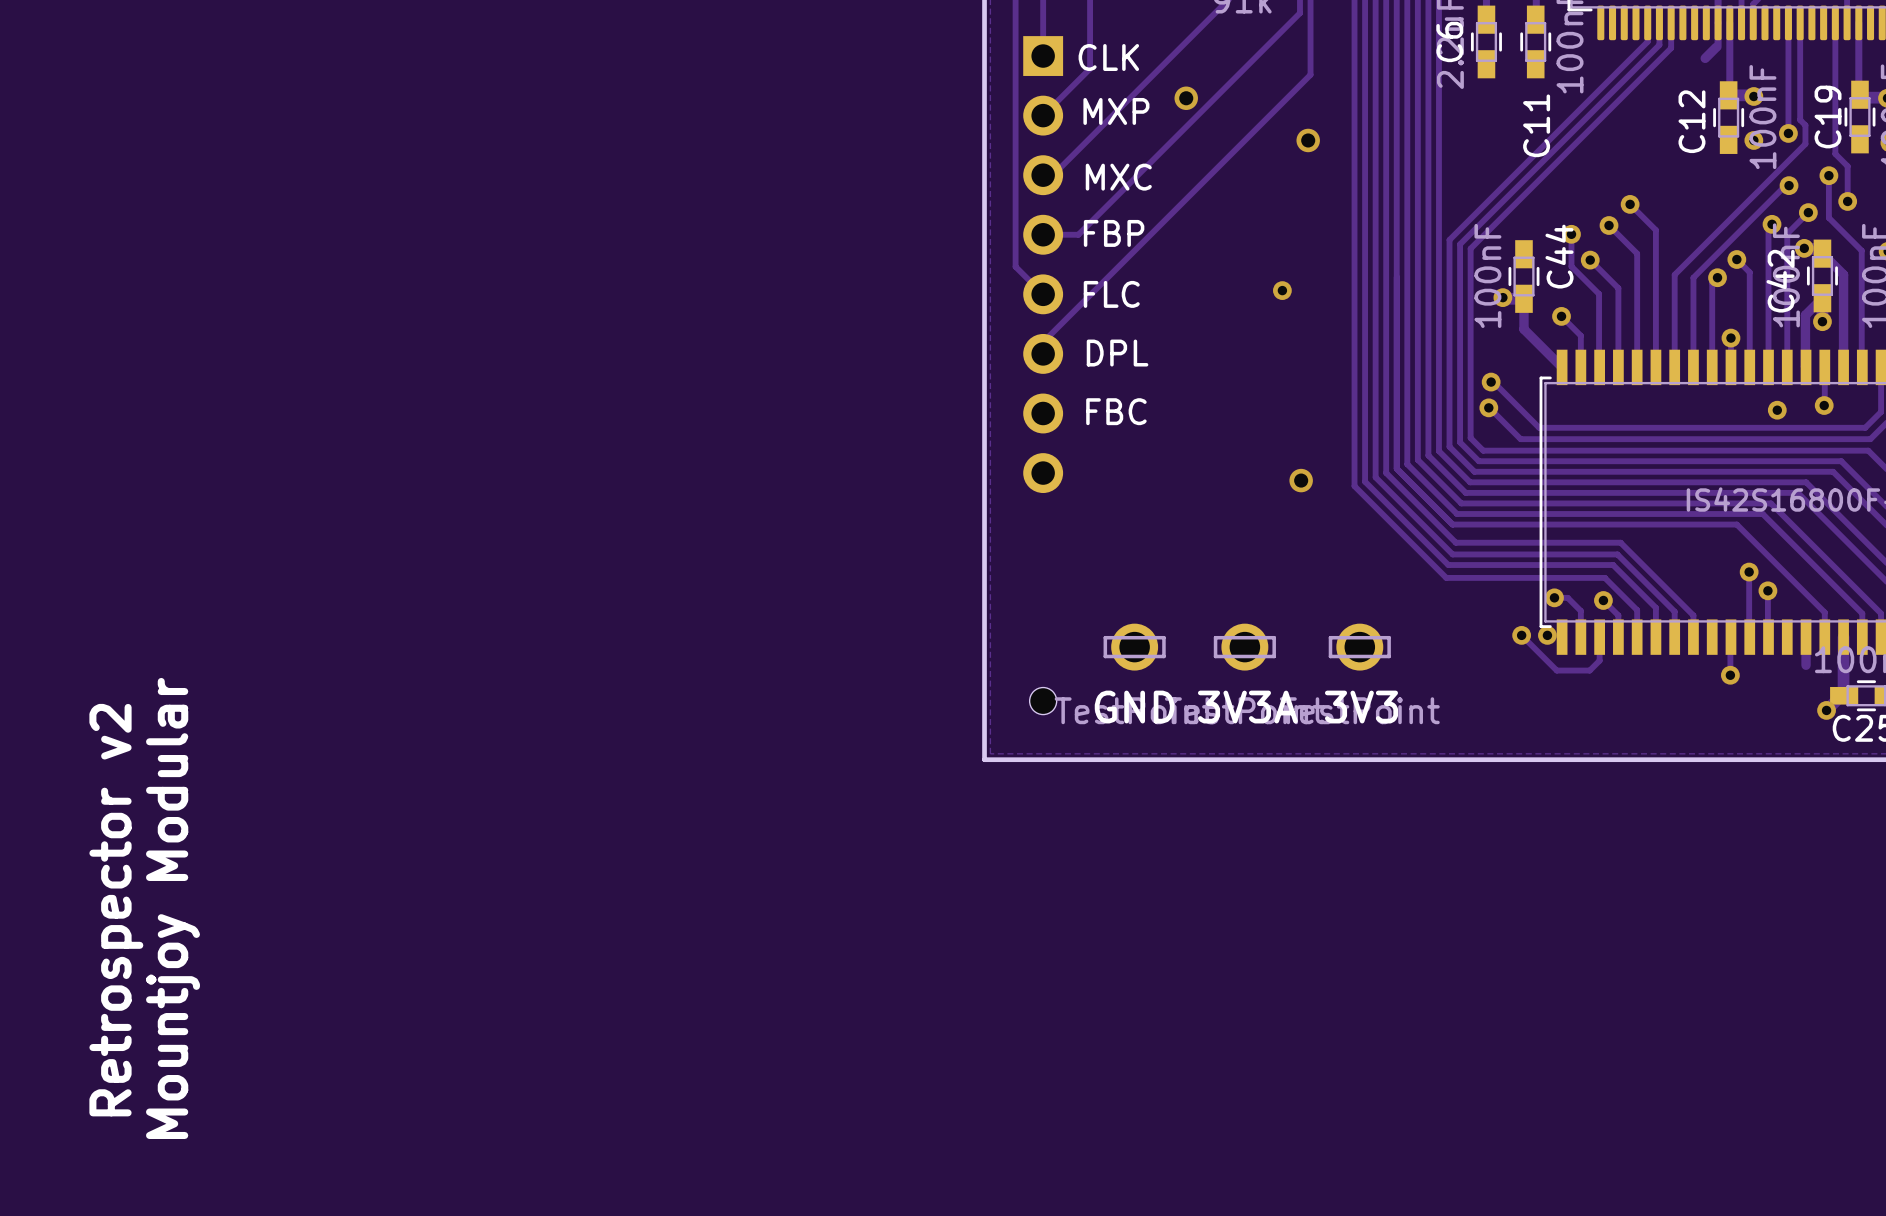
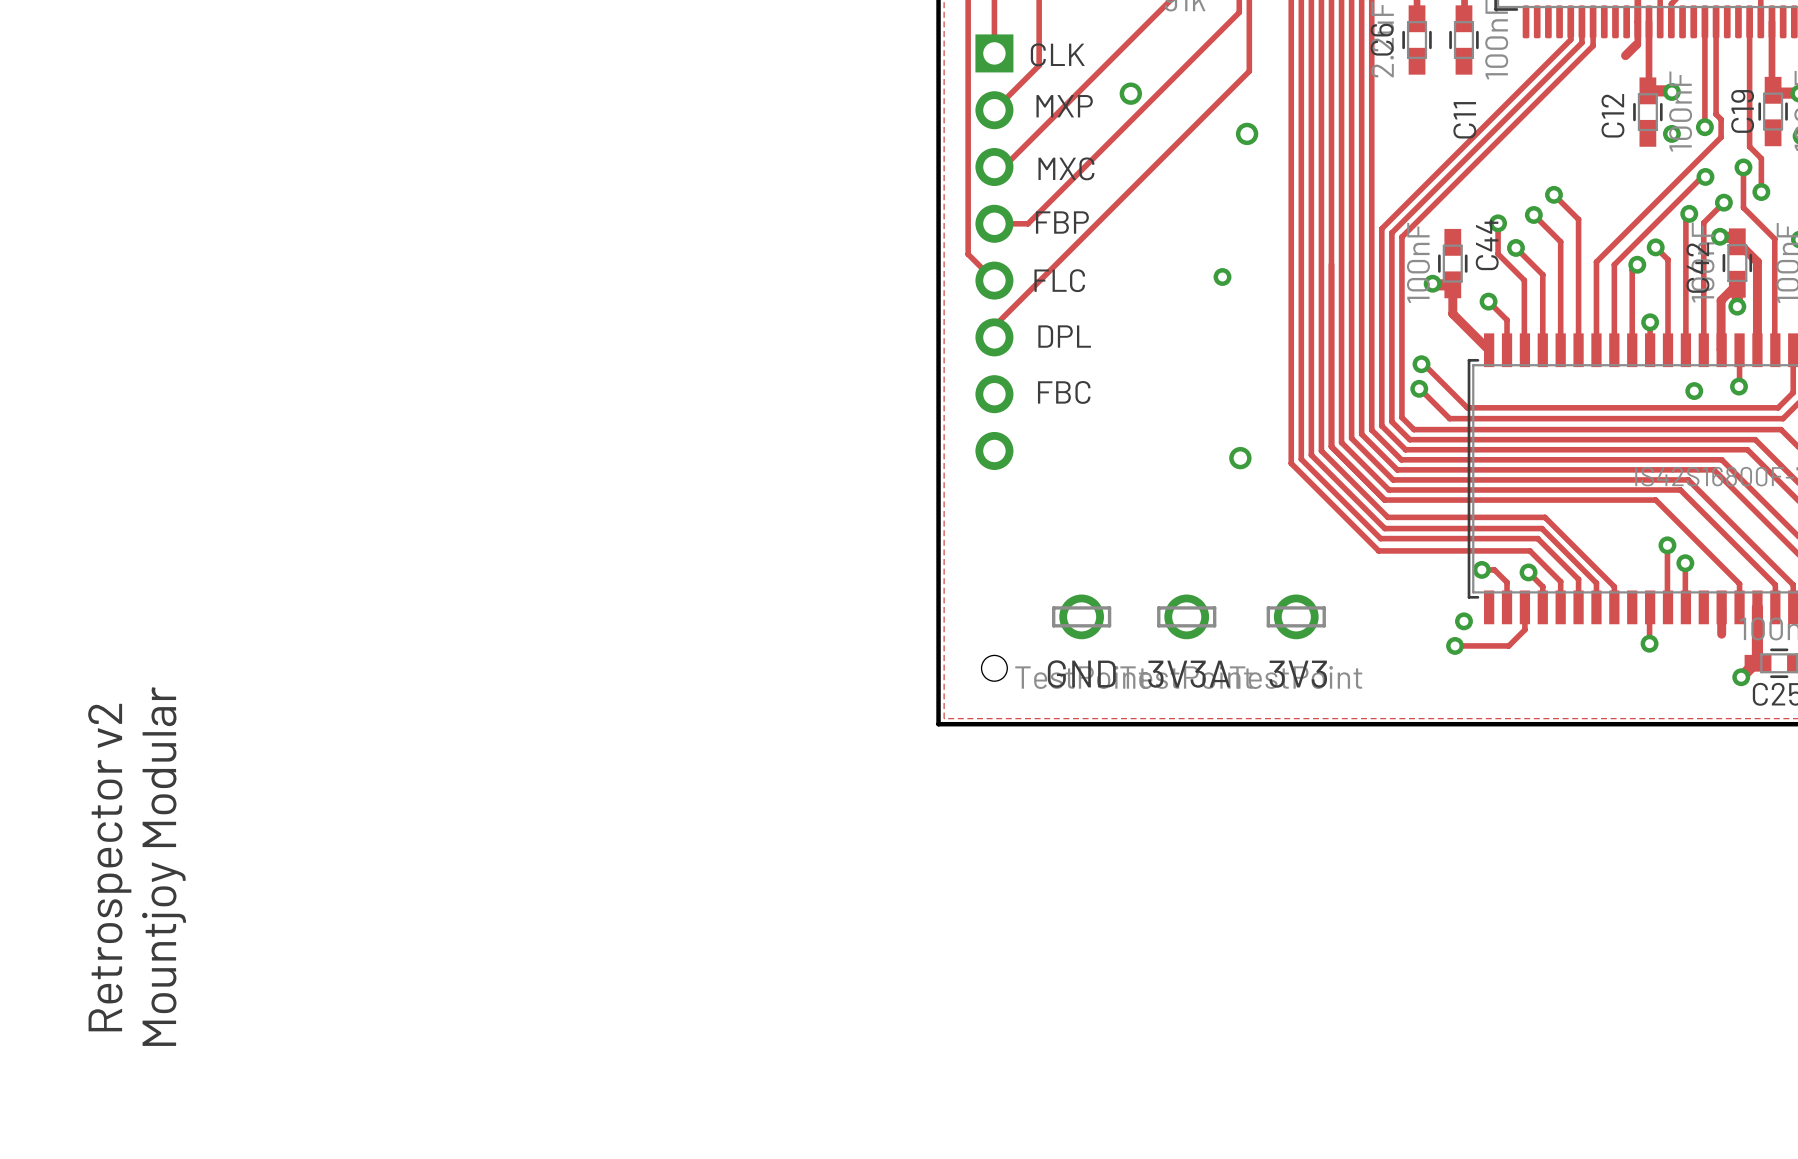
track: (1521, 635) (1556, 670) (1589, 670) -> (1455, 645) (1508, 645) (1515, 639)
via: (1521, 635) -> none
via: (1547, 635) -> none
via: none -> (1463, 621)
via: none -> (1455, 645)

